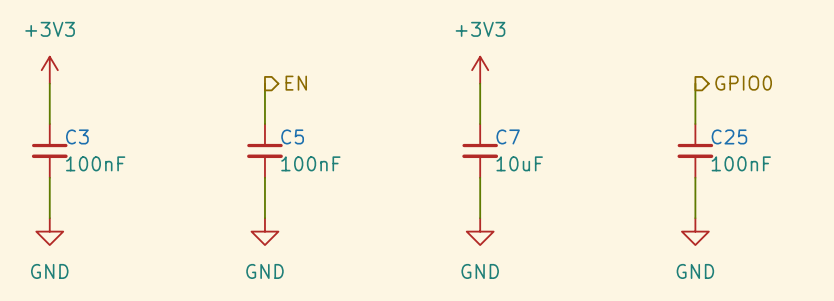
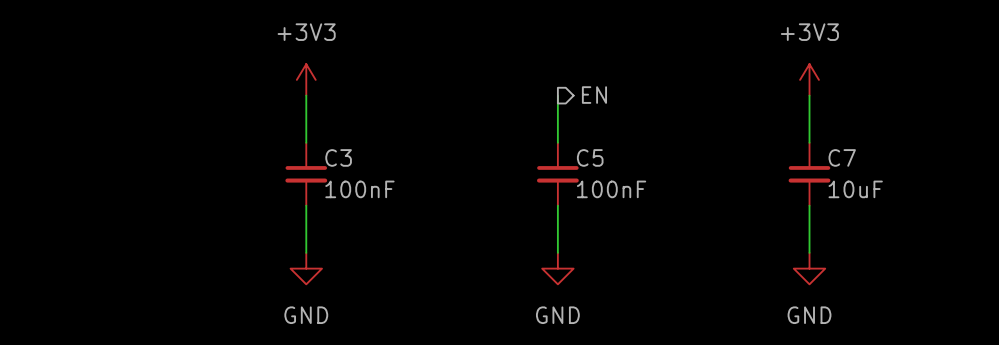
power symbol: +3V3 (49, 70) -> none
power symbol: none -> +3V3 (306, 79)
power symbol: +3V3 (480, 70) -> none
power symbol: none -> +3V3 (809, 79)
wire: (49, 83) (49, 124) -> none
hierarchical label position: EN (296, 83) -> EN (594, 95)
hierarchical label: GPIO0 (743, 83) -> none
C5 name: C5 (292, 136) -> C3 (338, 157)
C7 name: C7 (508, 136) -> C5 (590, 157)
C25 name: C25 (729, 136) -> C7 (842, 157)
C3: 100nF (49, 150) -> none
C7 value: 10uF (519, 163) -> 100nF (611, 189)
C25 value: 100nF (741, 163) -> 10uF (855, 189)
wire: (49, 177) (49, 218) -> none
power symbol: GND (49, 231) -> none

